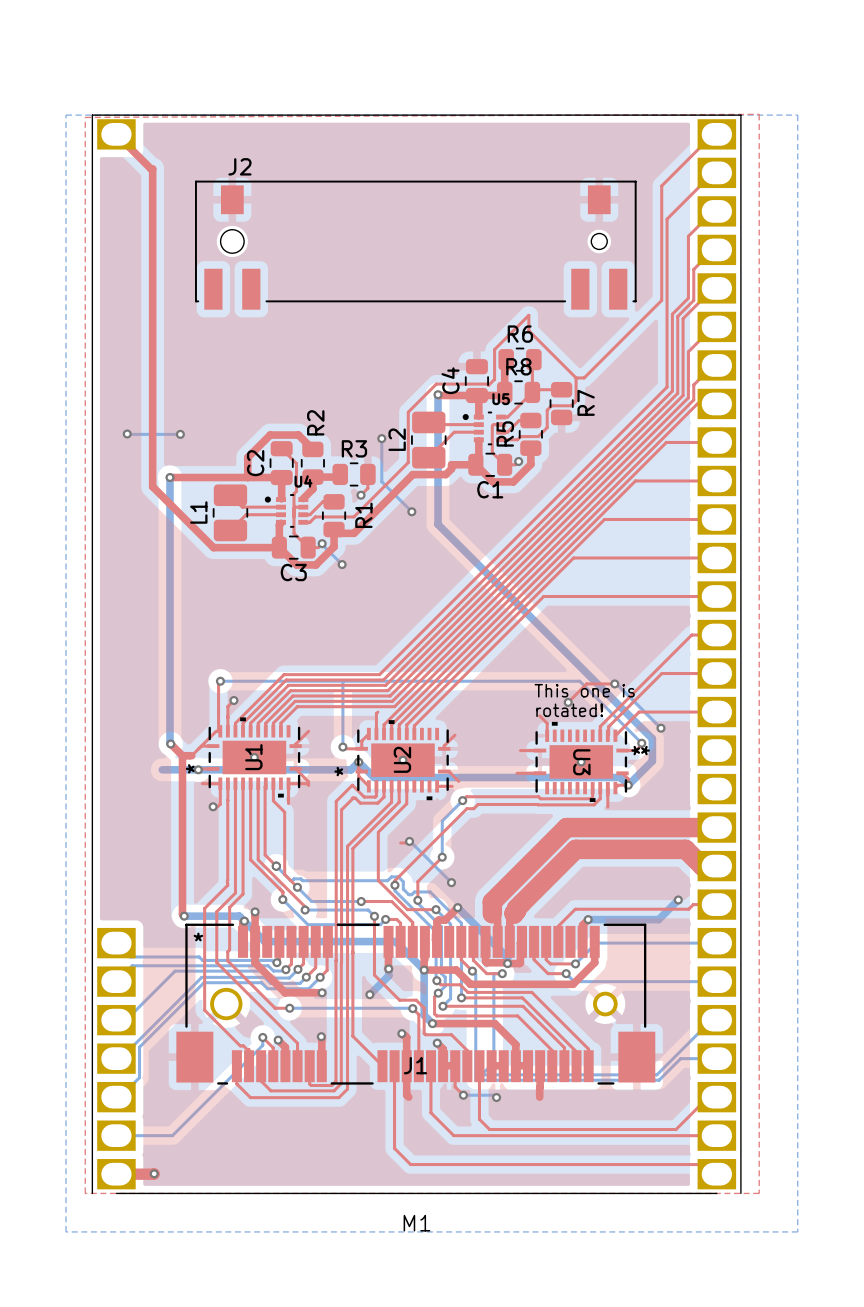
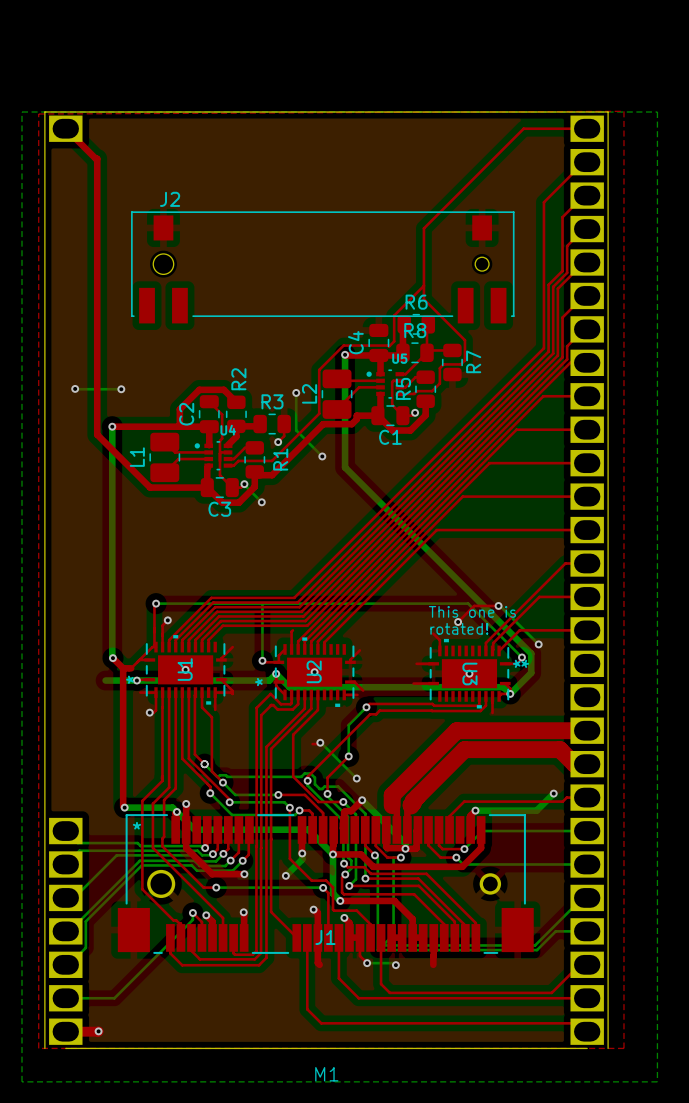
top track: (713, 134) (661, 185) (661, 300) (584, 377) (576, 377) -> (584, 128) (523, 128) (423, 228) (423, 285)
J2 position: (415, 245) -> (322, 267)

